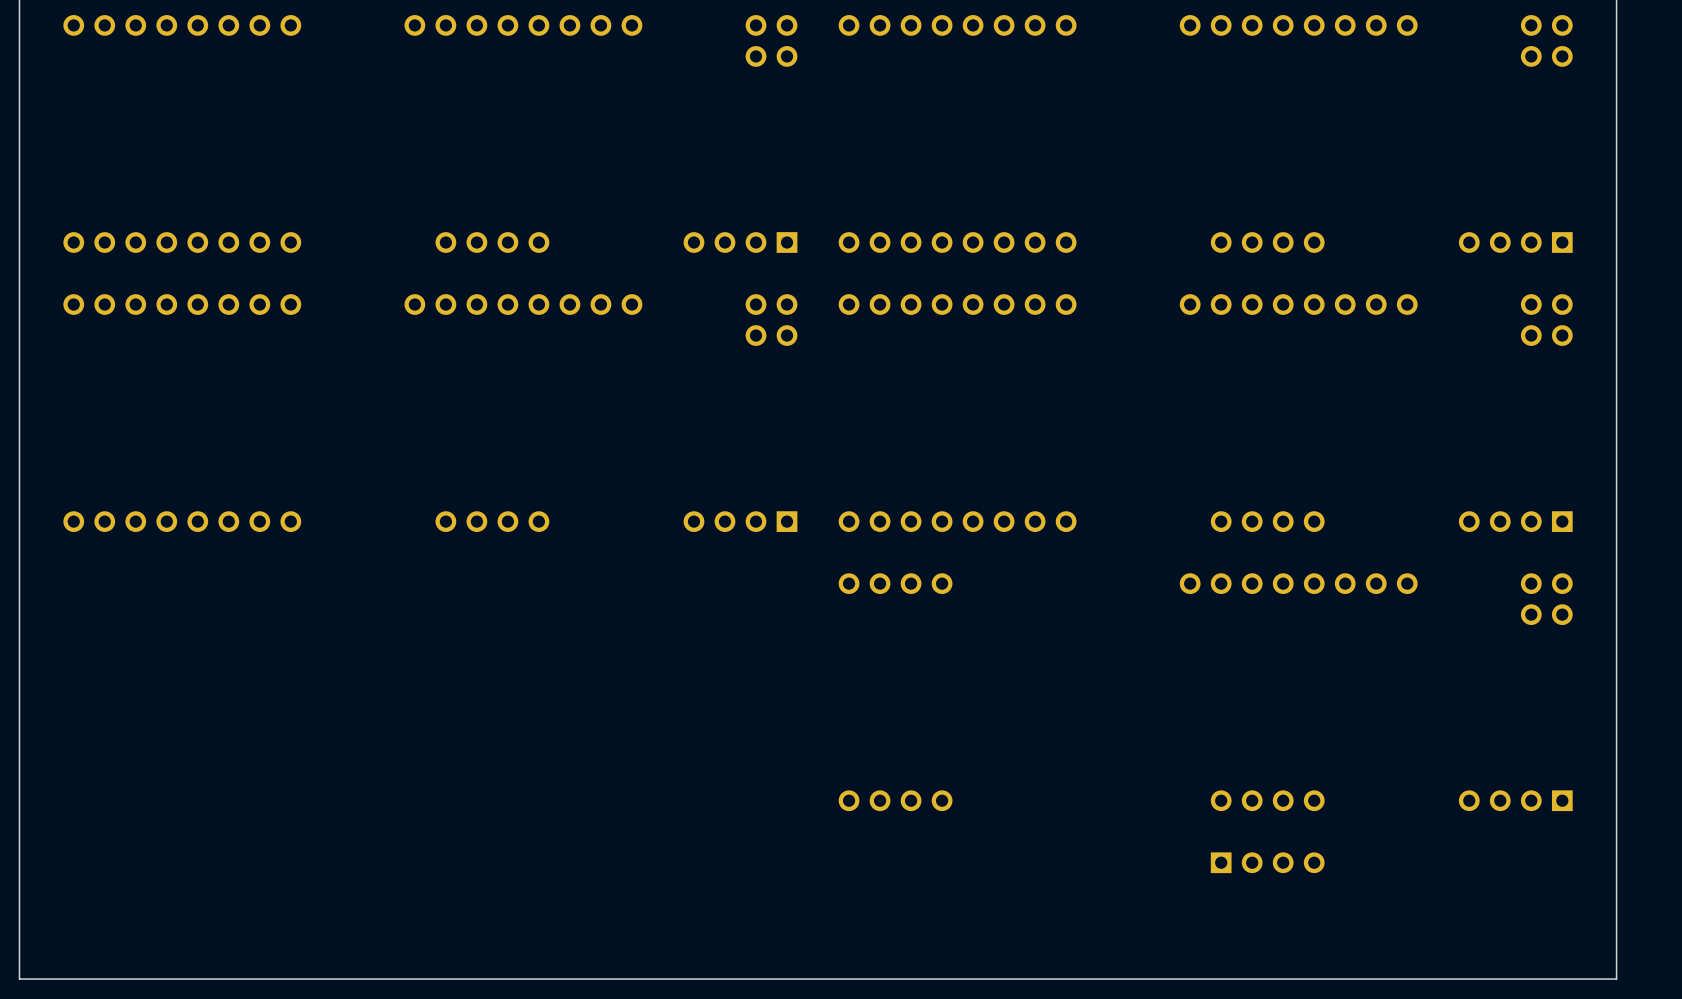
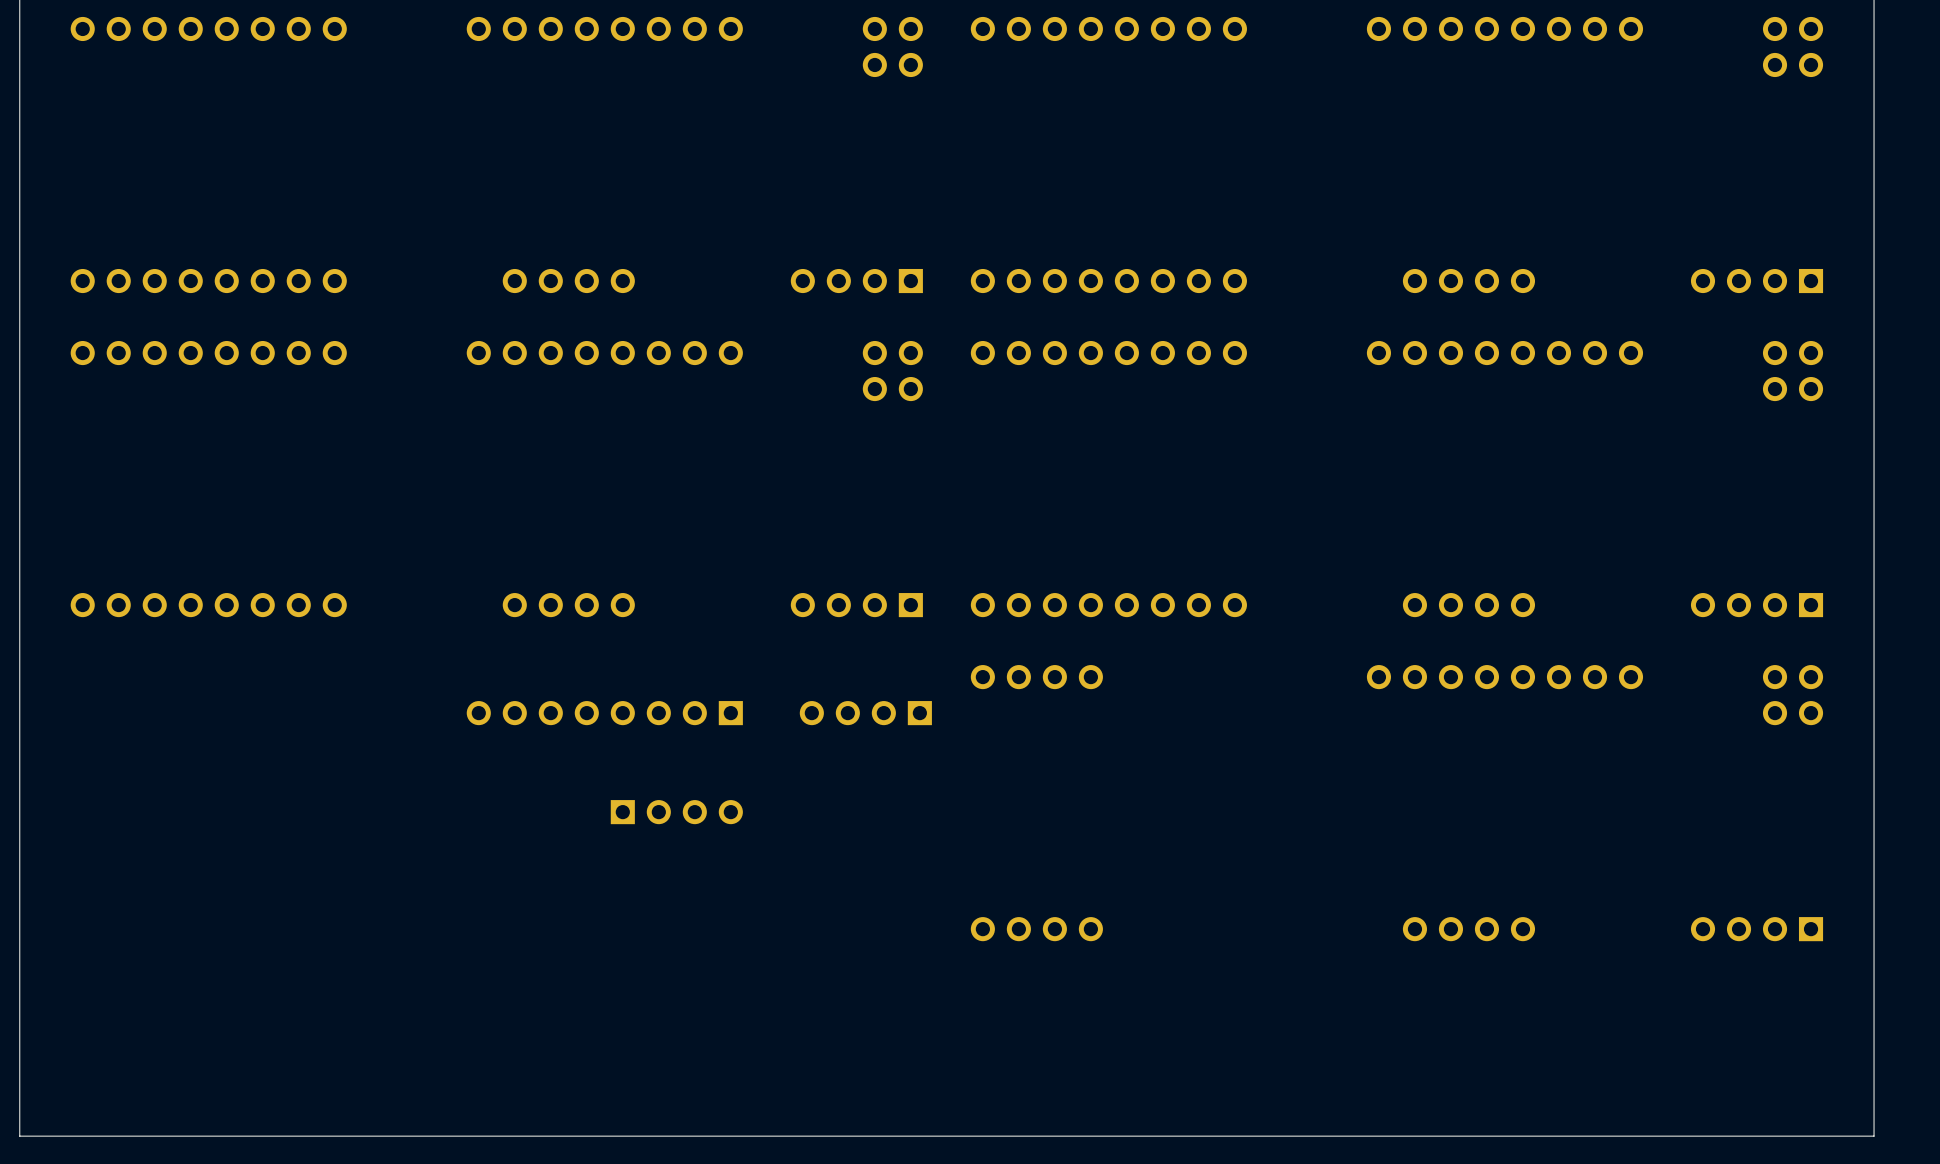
part: none -> (604, 713)
part: none -> (865, 713)
part: none -> (676, 812)
part: (1267, 862) -> none

